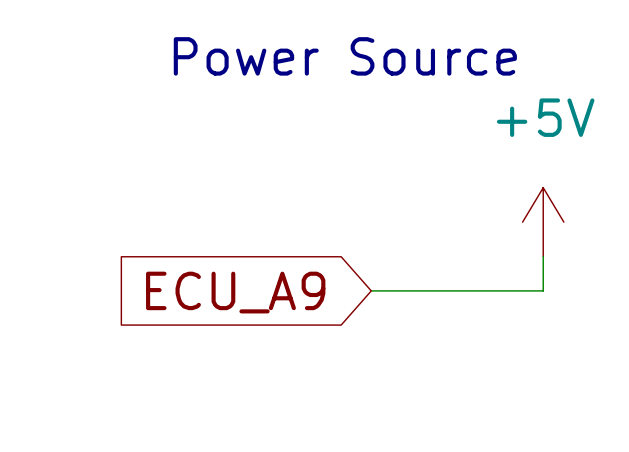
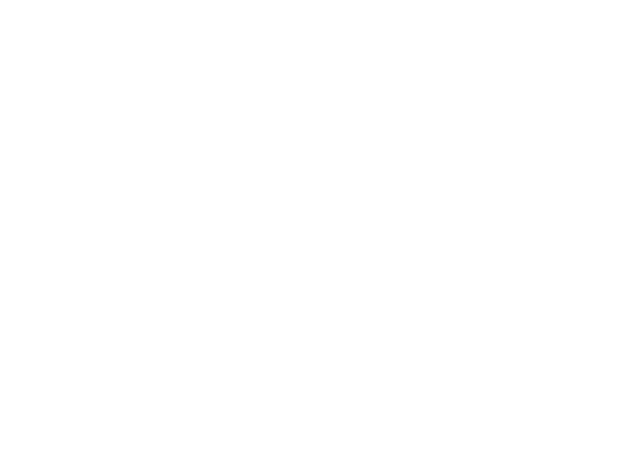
text: Power Source (345, 56) -> none
power symbol: +5V (543, 222) -> none
wire: (543, 256) (543, 290) (371, 290) -> none
global label: ECU_A9 (235, 292) -> none

